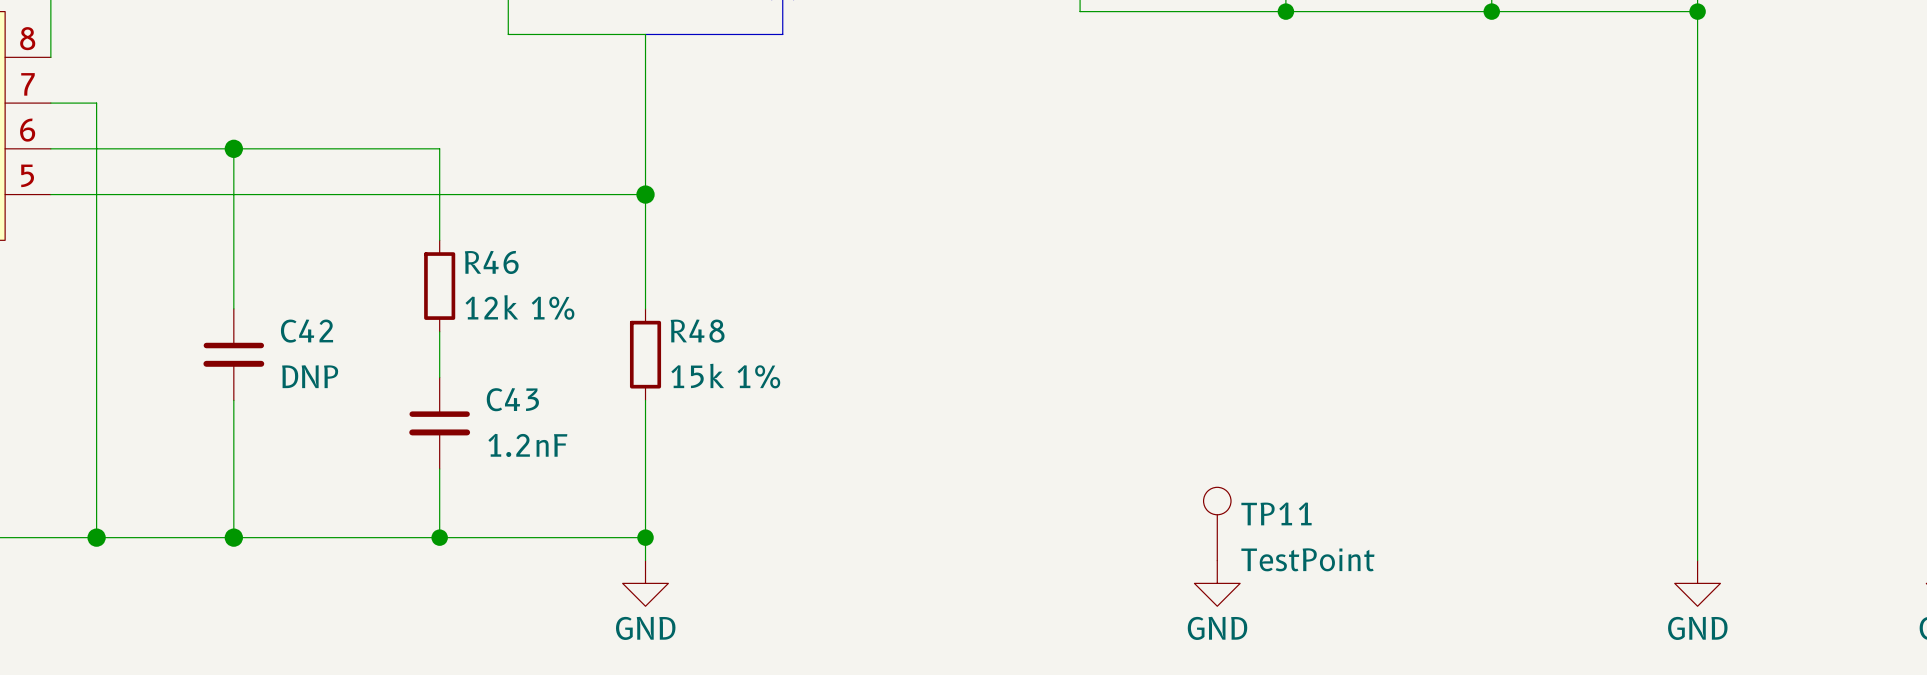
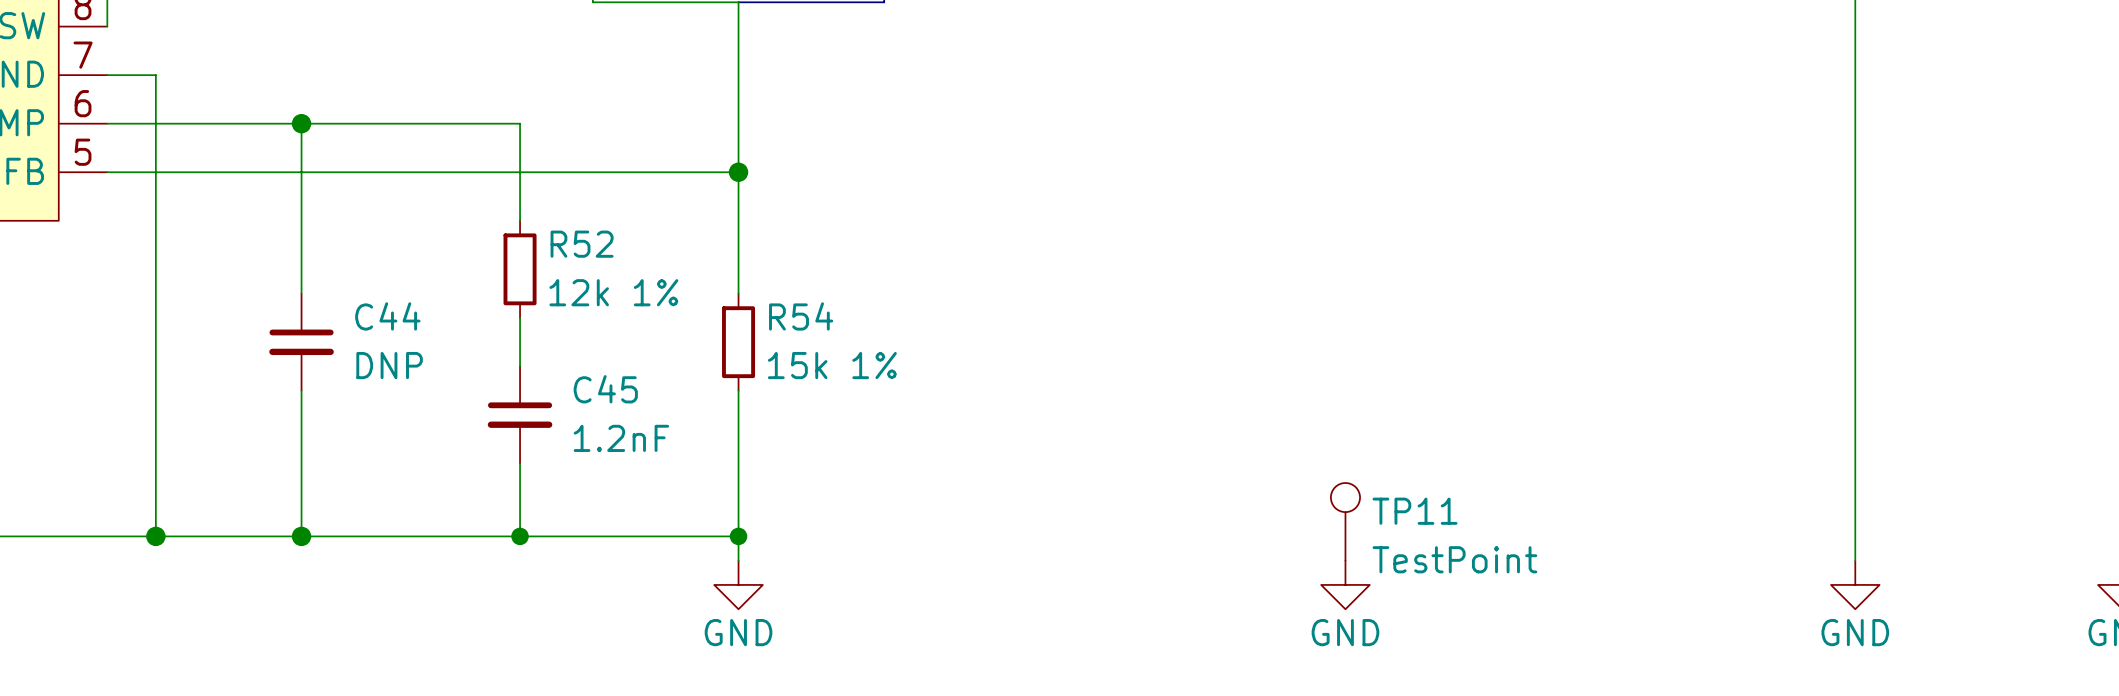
R46 name: R46 (491, 262) -> R52 (582, 244)
C42 name: C42 (307, 331) -> C44 (387, 316)
R48 name: R48 (697, 331) -> R54 (801, 316)
C43 name: C43 (512, 399) -> C45 (605, 389)

